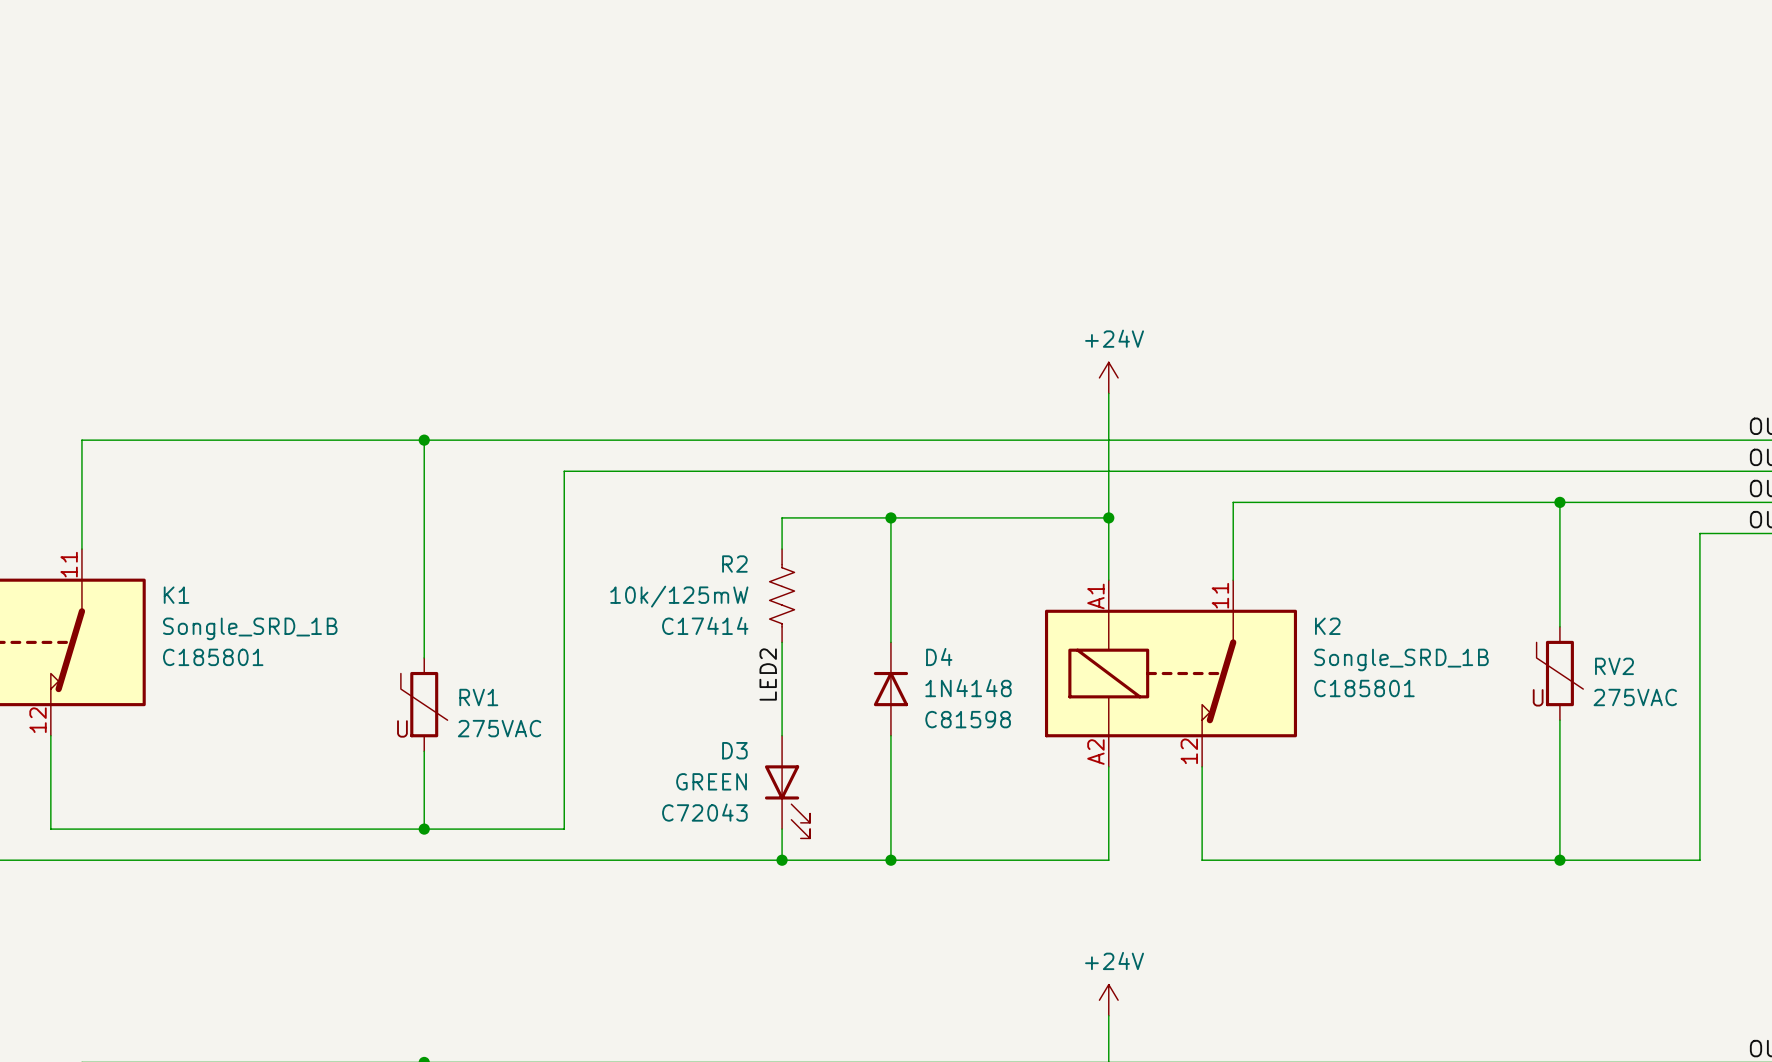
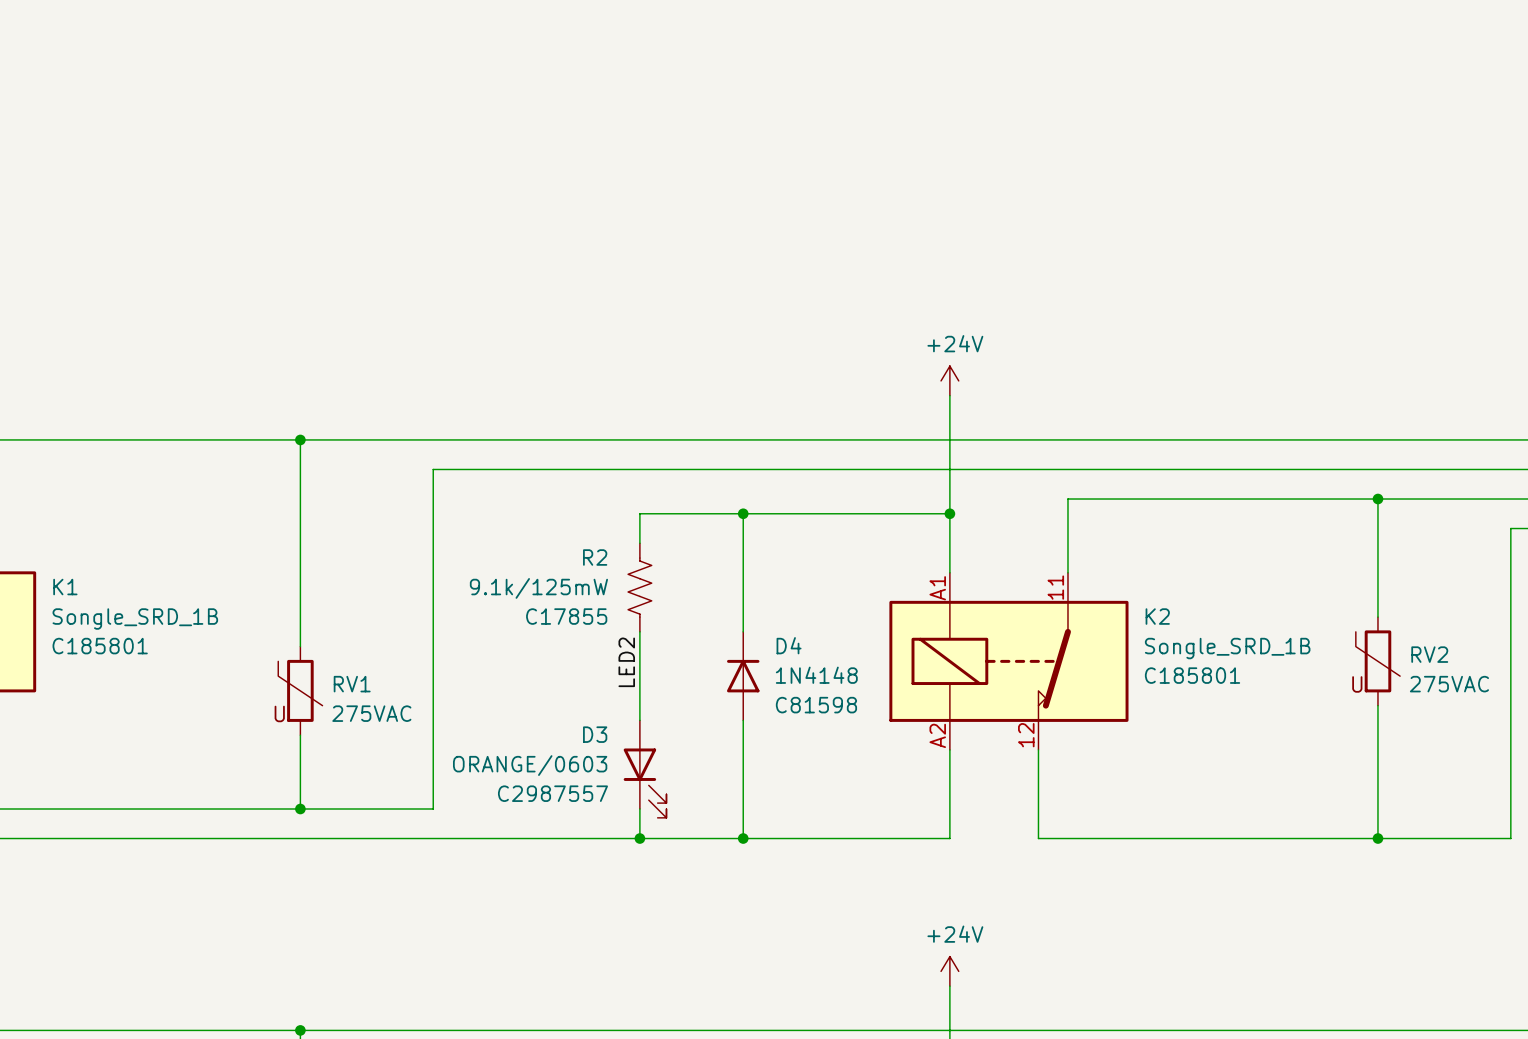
R2 value: 10k/125mW (679, 596) -> 9.1k/125mW (538, 588)
R2 text: C17414 (705, 625) -> C17855 (566, 616)
D3 value: GREEN (711, 781) -> ORANGE/0603 (530, 765)
D3 text: C72043 (704, 812) -> C2987557 (552, 793)

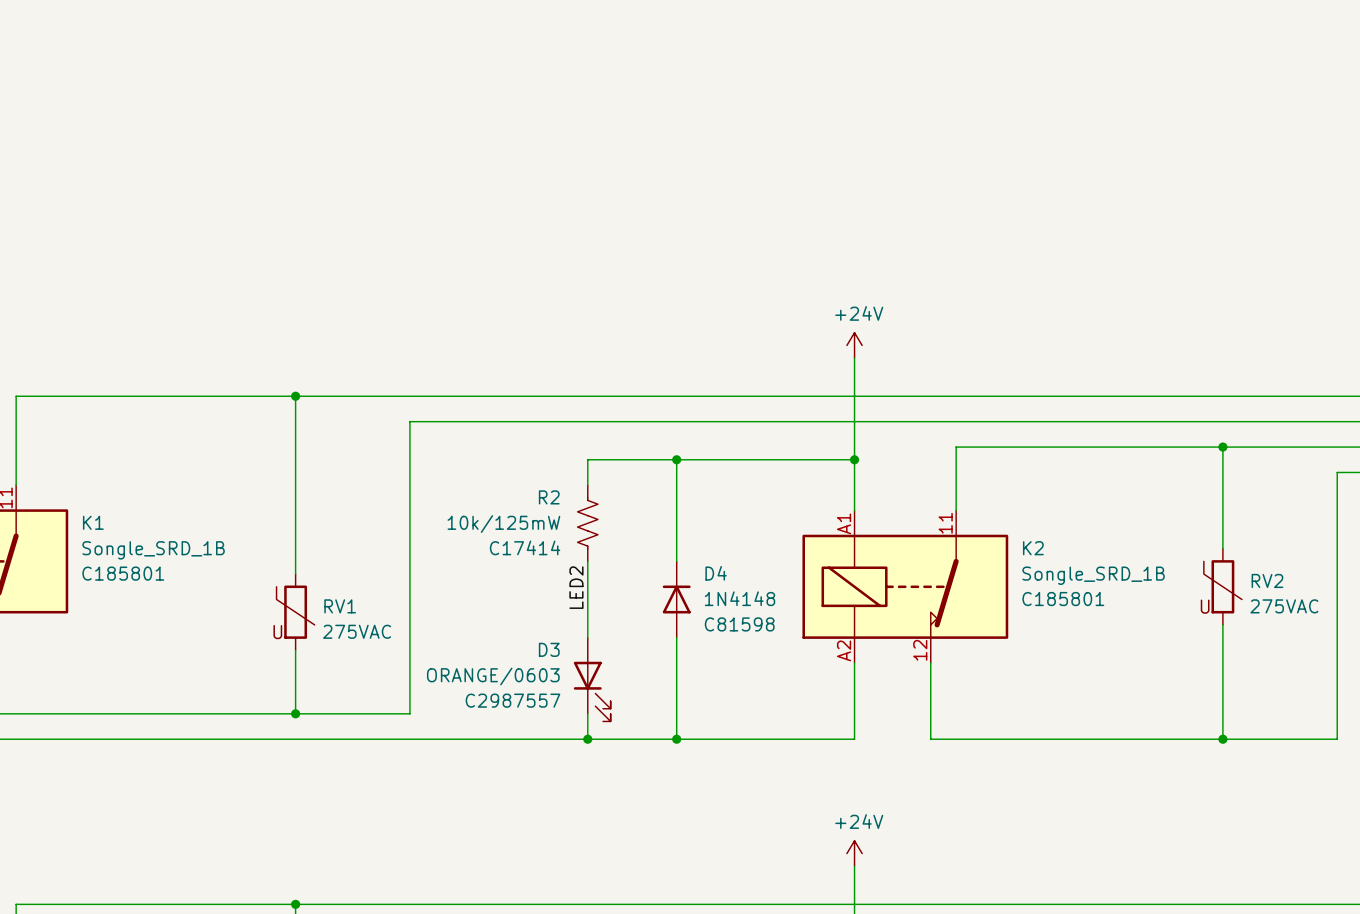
R2 value: 9.1k/125mW (538, 588) -> 10k/125mW (503, 524)
R2 text: C17855 (566, 616) -> C17414 (525, 547)

